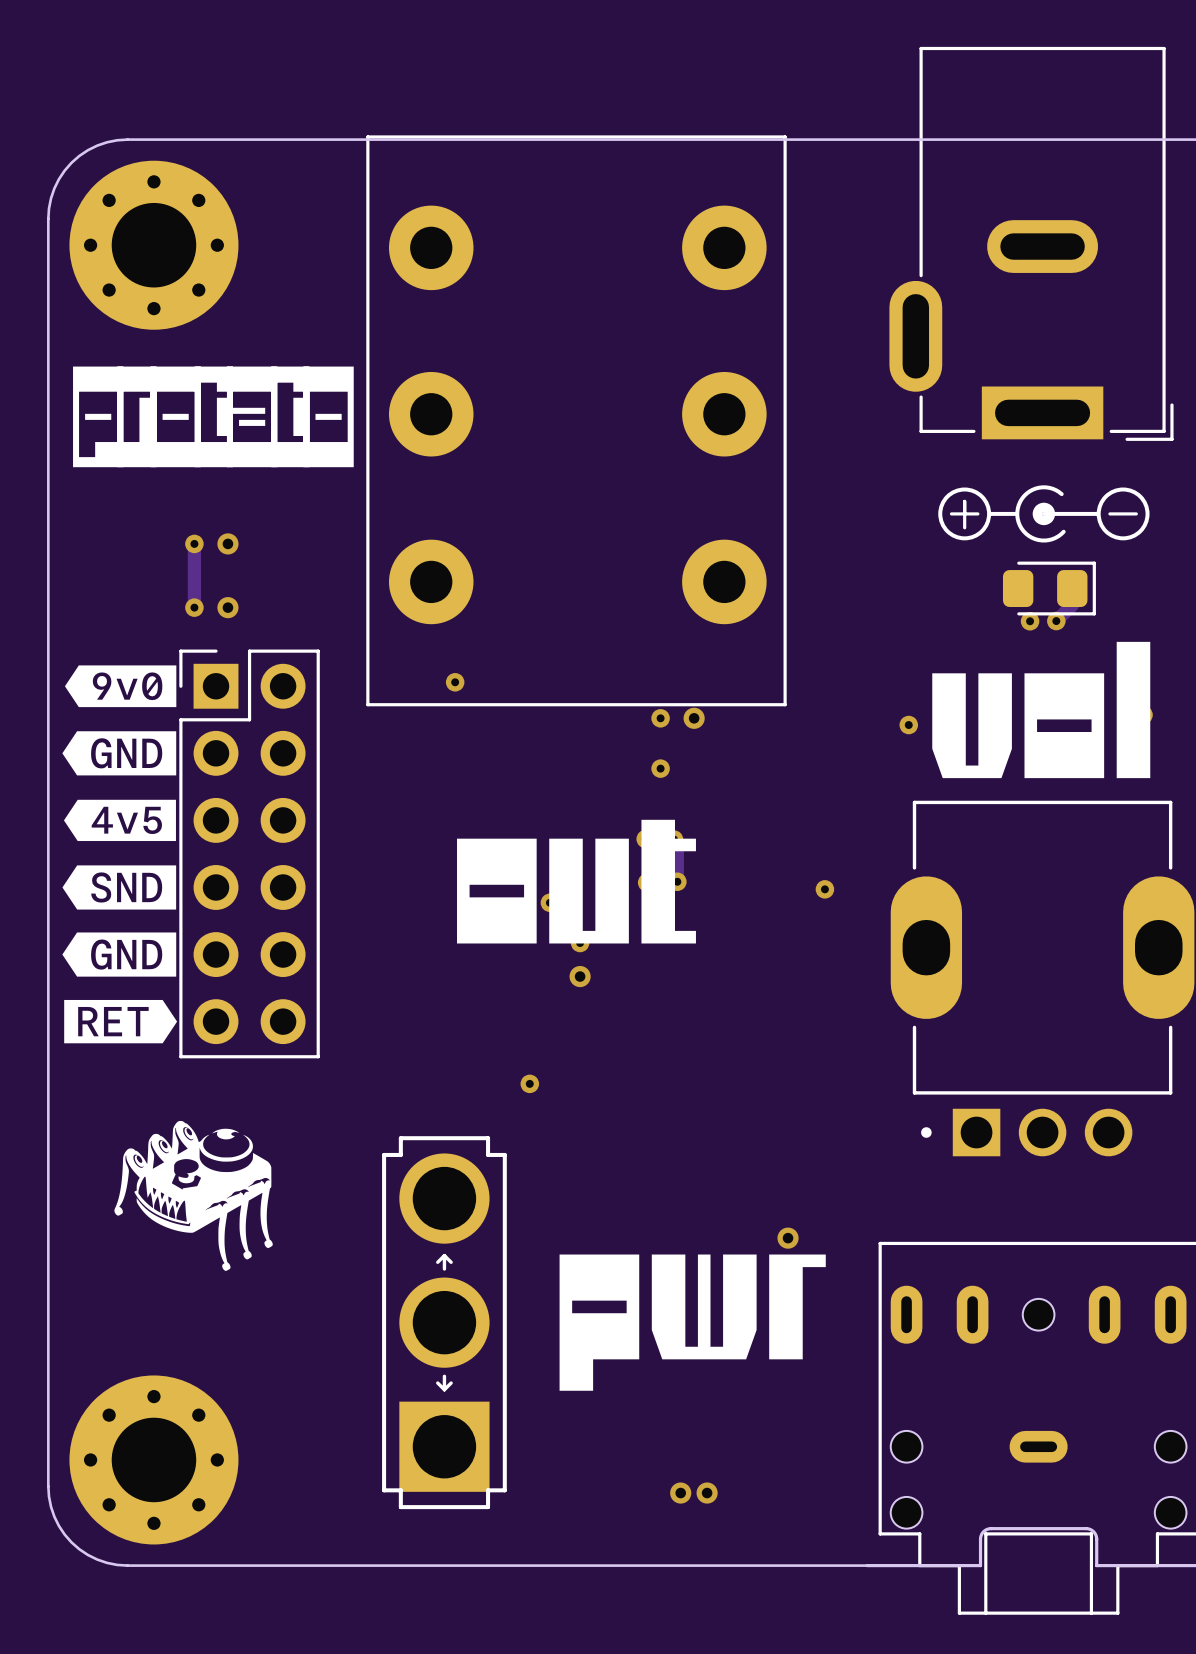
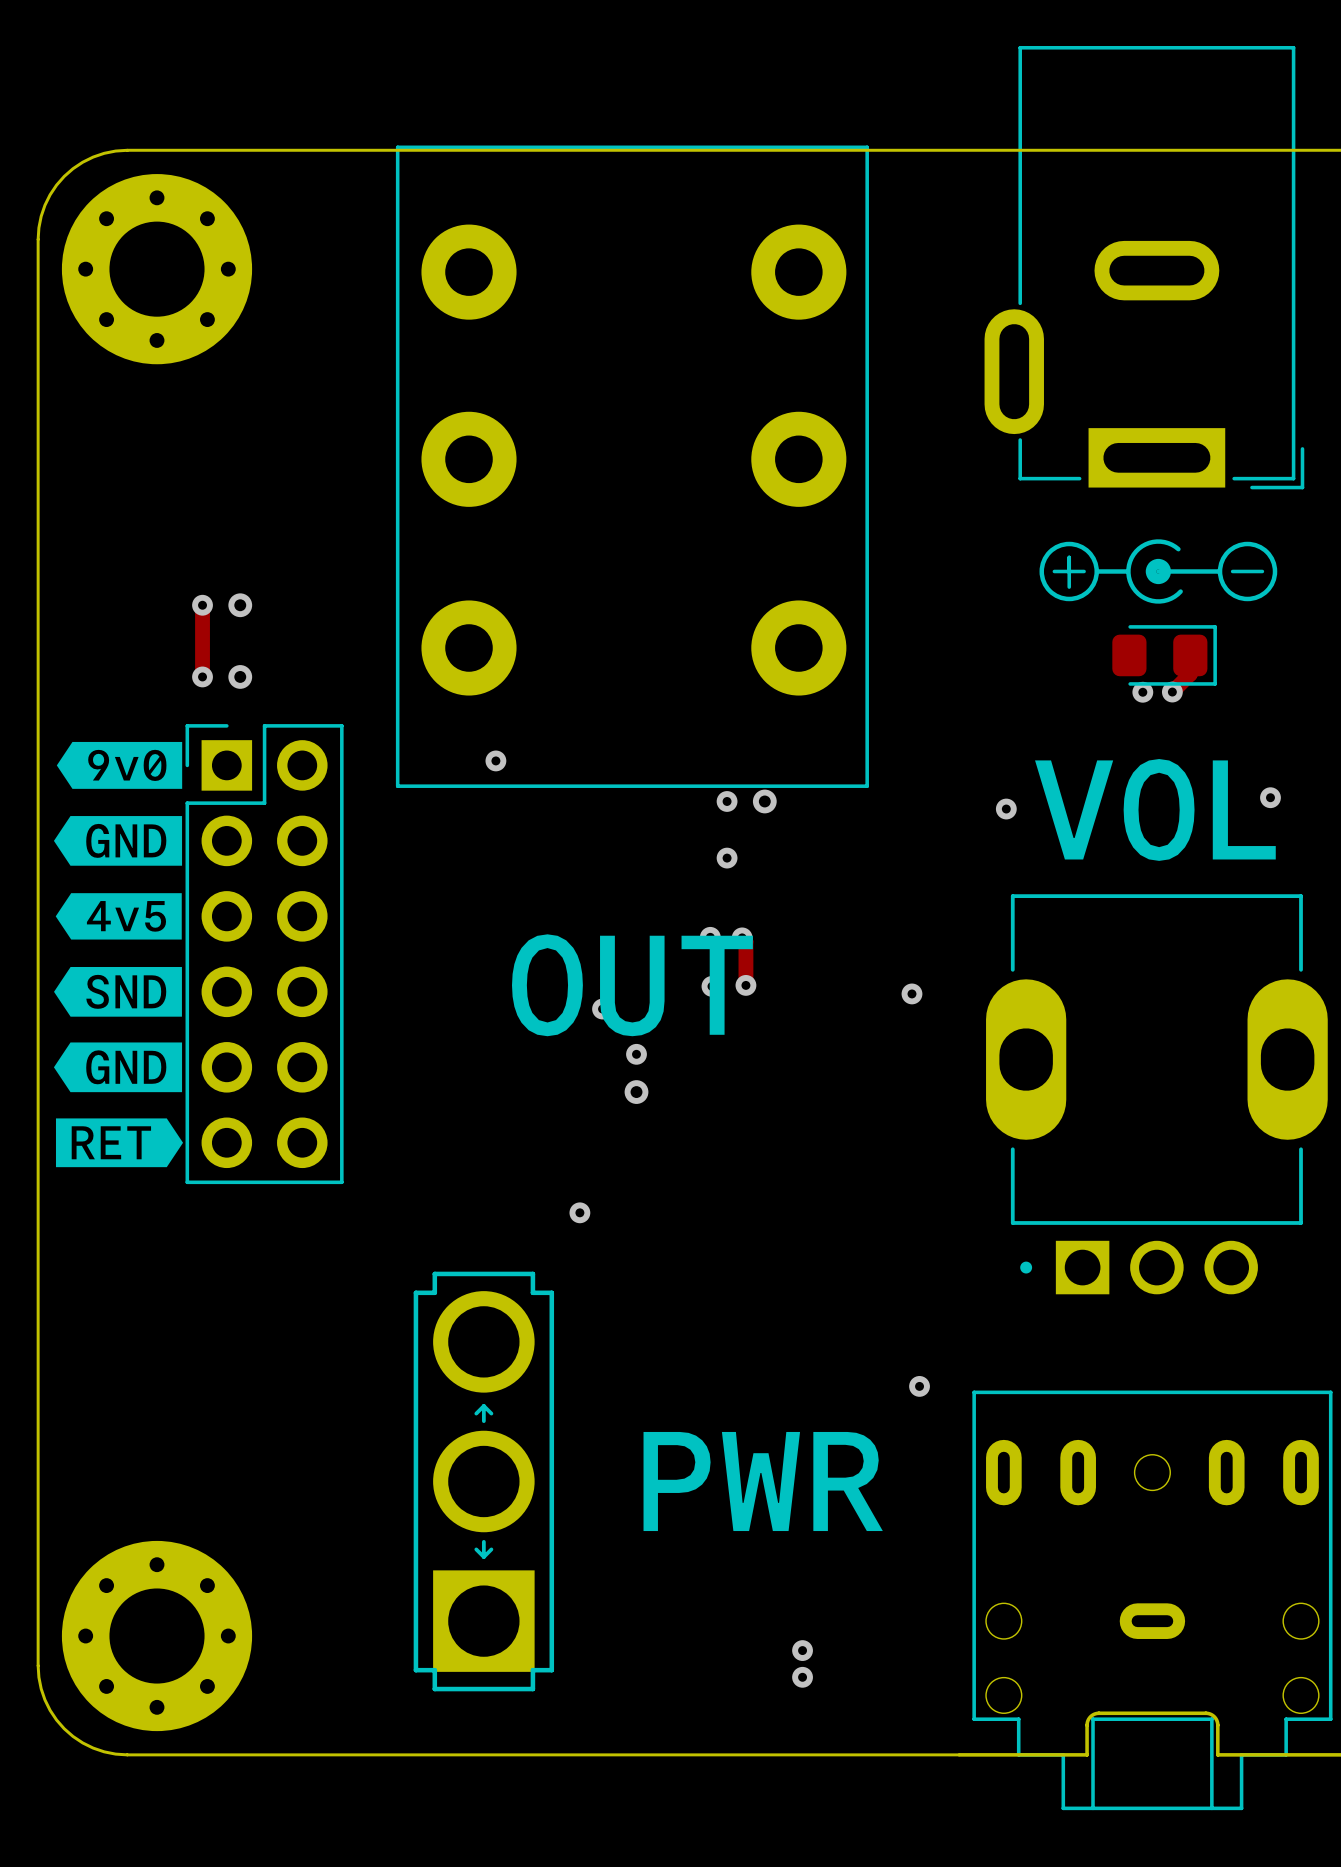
drawing: [73, 366, 354, 468] -> none
drawing shape: [932, 641, 1151, 779] -> [1035, 759, 1276, 861]
drawing shape: [457, 819, 696, 944] -> [512, 934, 753, 1037]
drawing: [114, 1120, 273, 1271] -> none
via: (788, 1238) -> none
via: none -> (919, 1386)
drawing shape: [559, 1254, 826, 1391] -> [643, 1431, 883, 1532]
via: none -> (802, 1650)
via: (680, 1493) -> none
via: (707, 1493) -> none
via: none -> (802, 1677)

